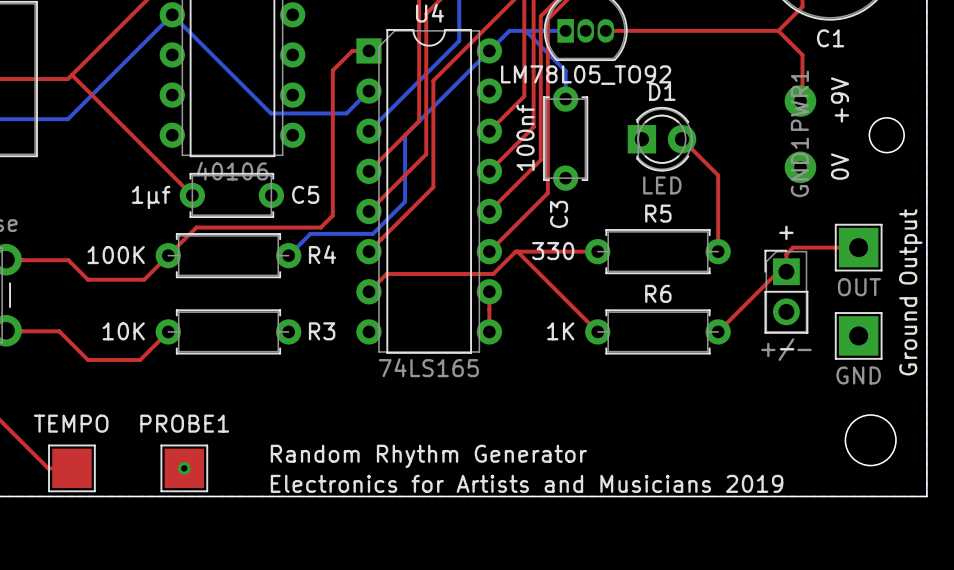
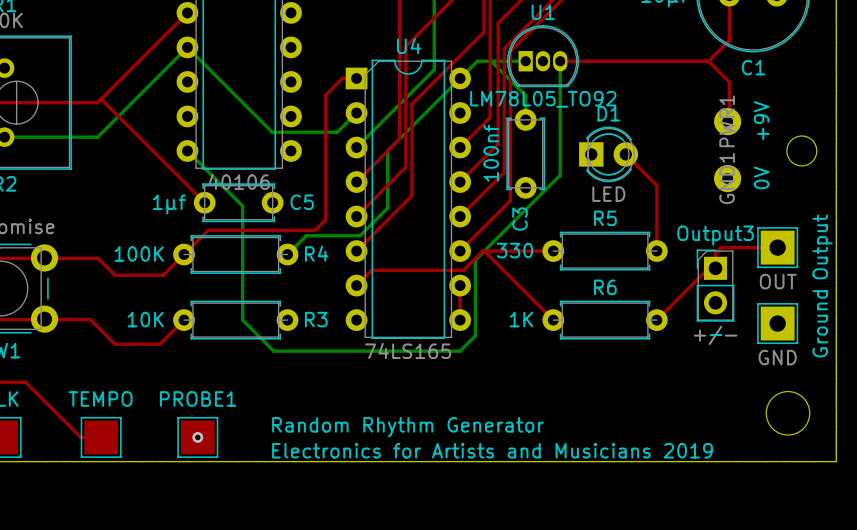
bottom track: none -> (560, 61) (560, 175)
bottom track: none -> (187, 150) (242, 206) (242, 320) (273, 351) (460, 351) (475, 335) (475, 259) (560, 175)
Output3 name: + (786, 232) -> Output3 (715, 235)

